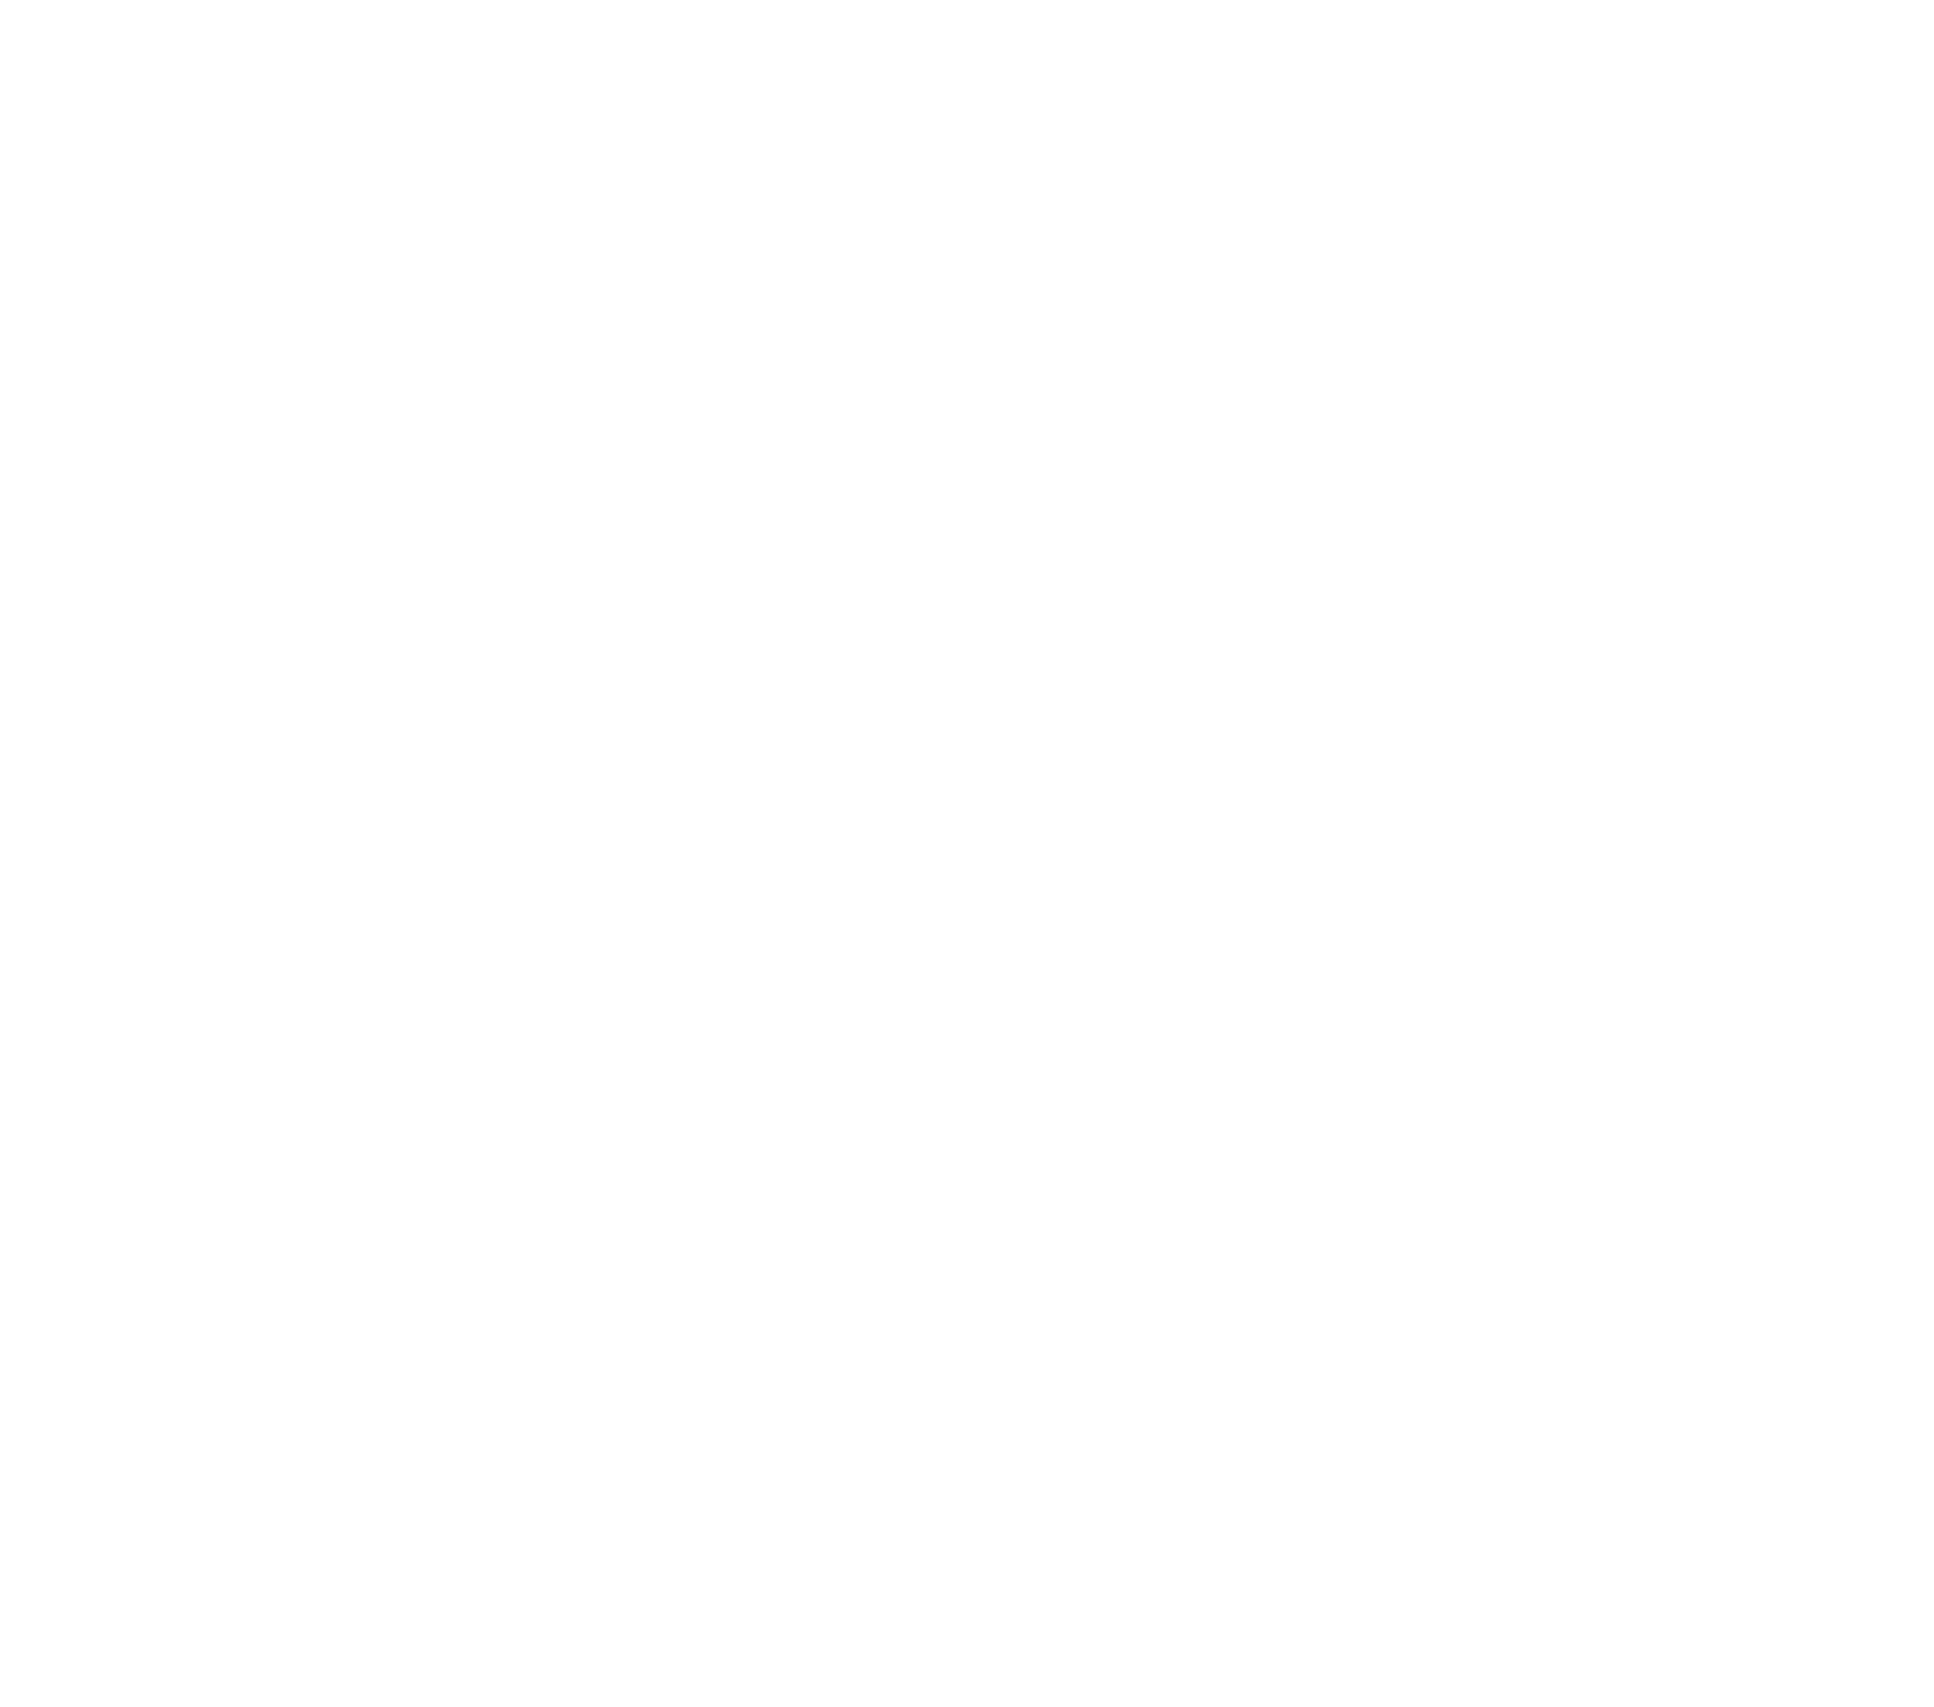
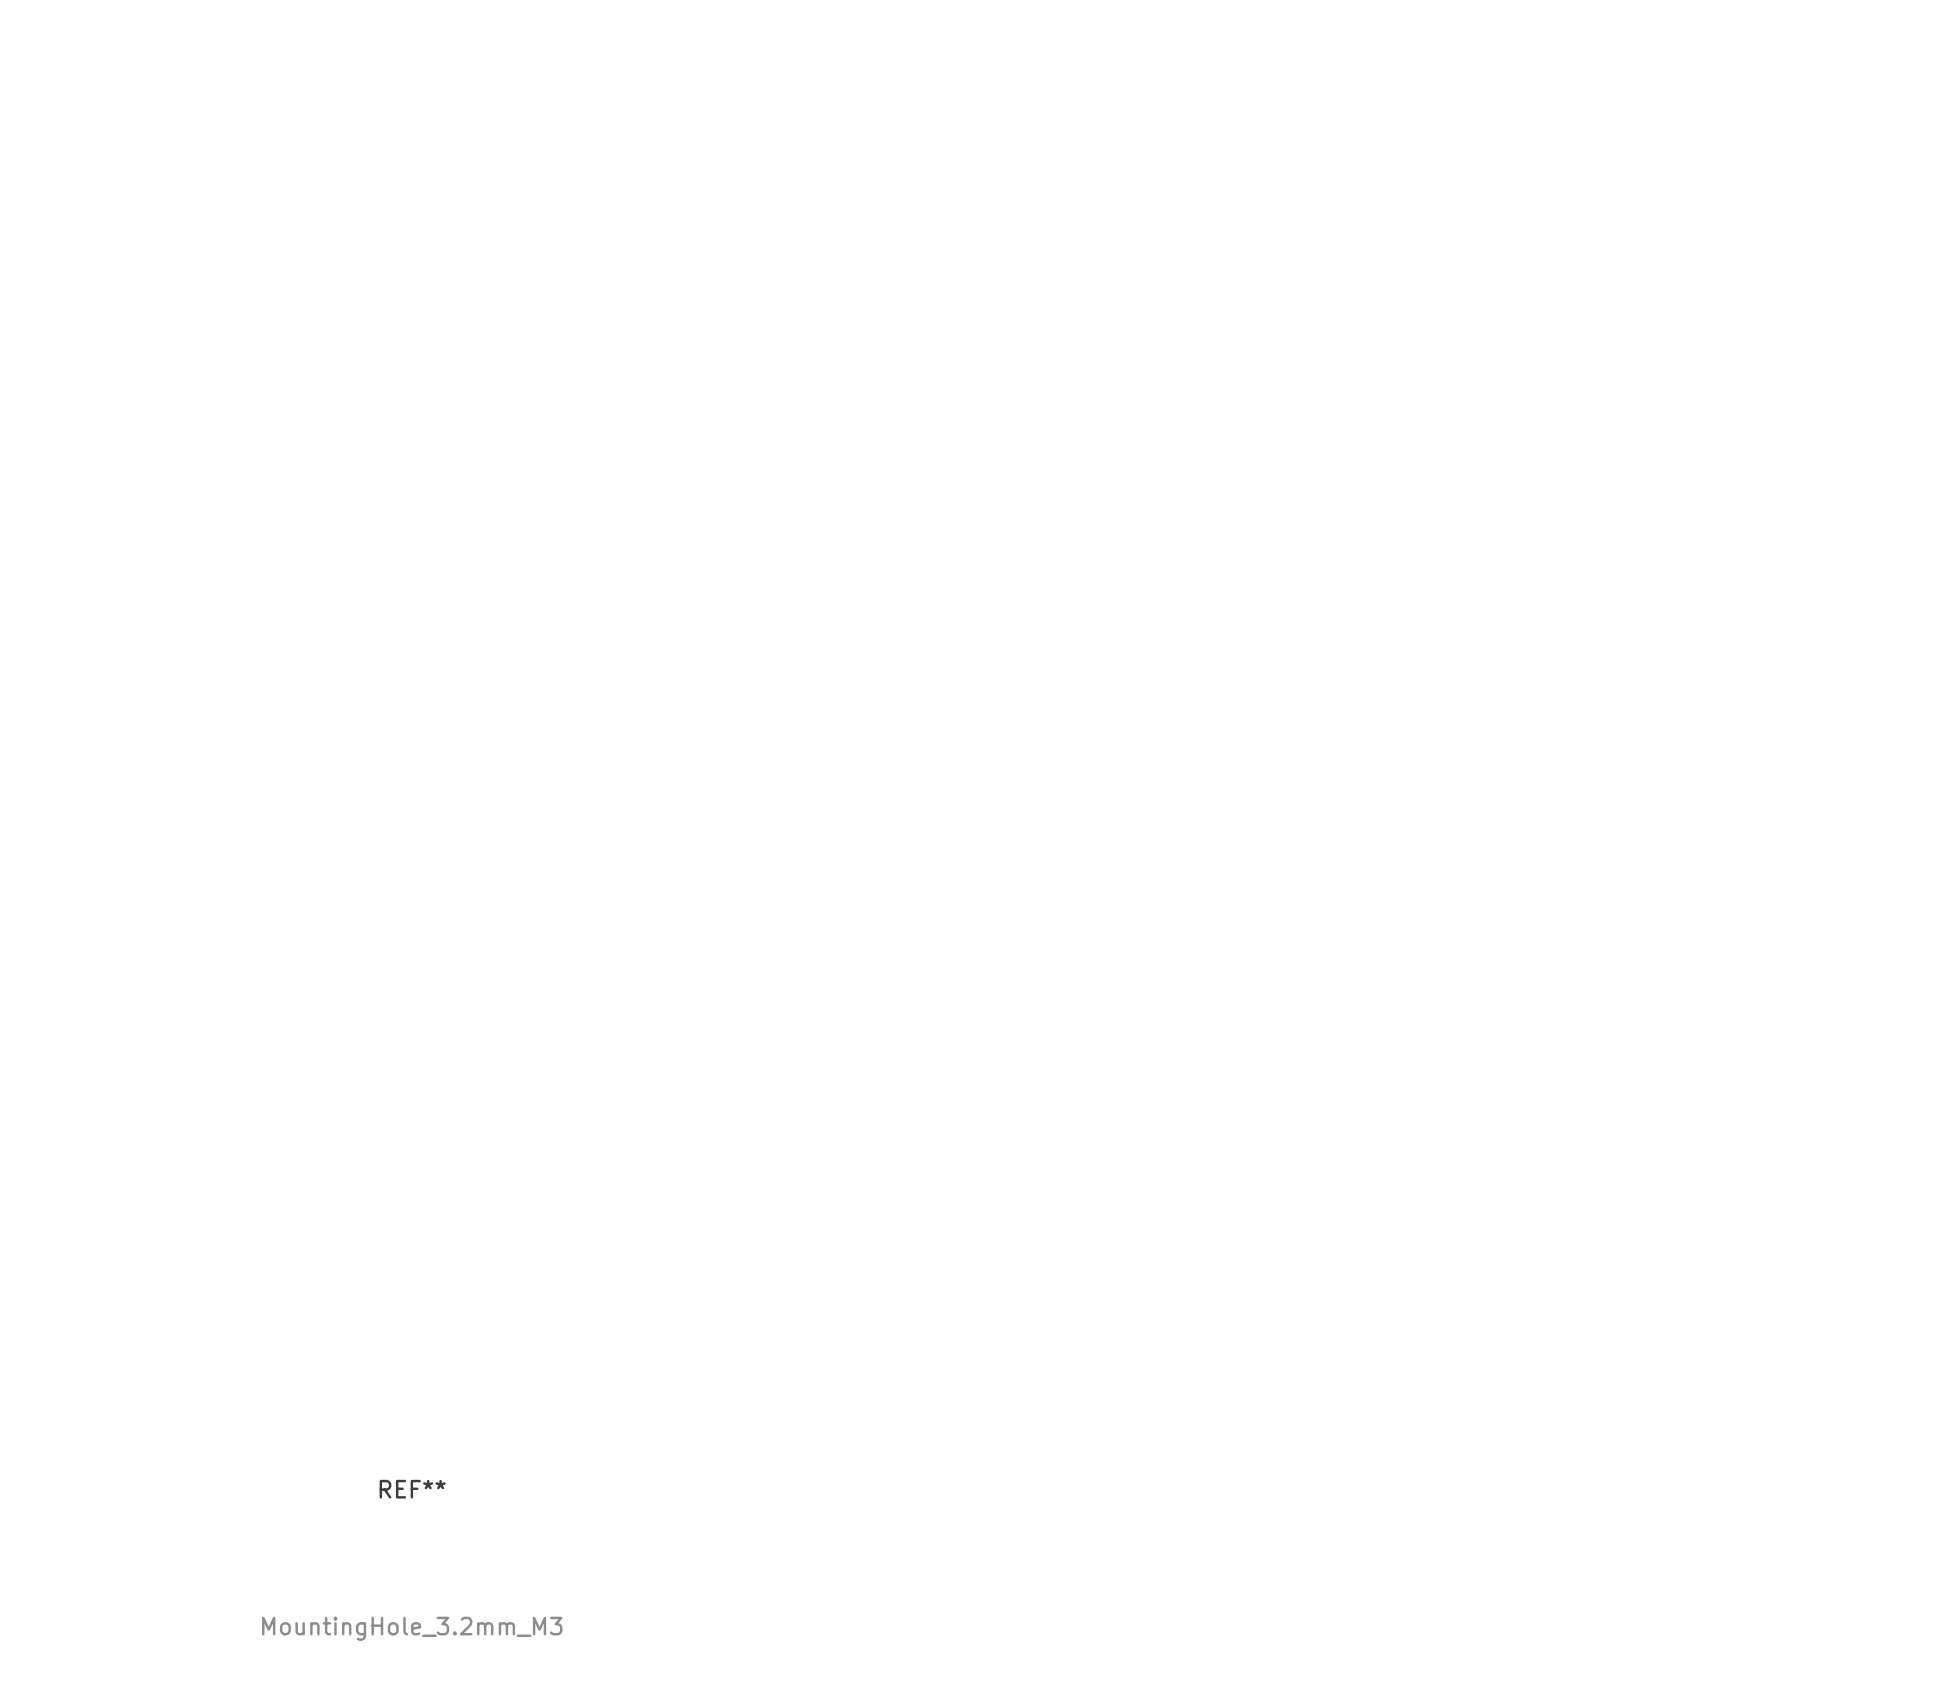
REF**: none -> MountingHole_3.2mm_M3 (412, 1560)

